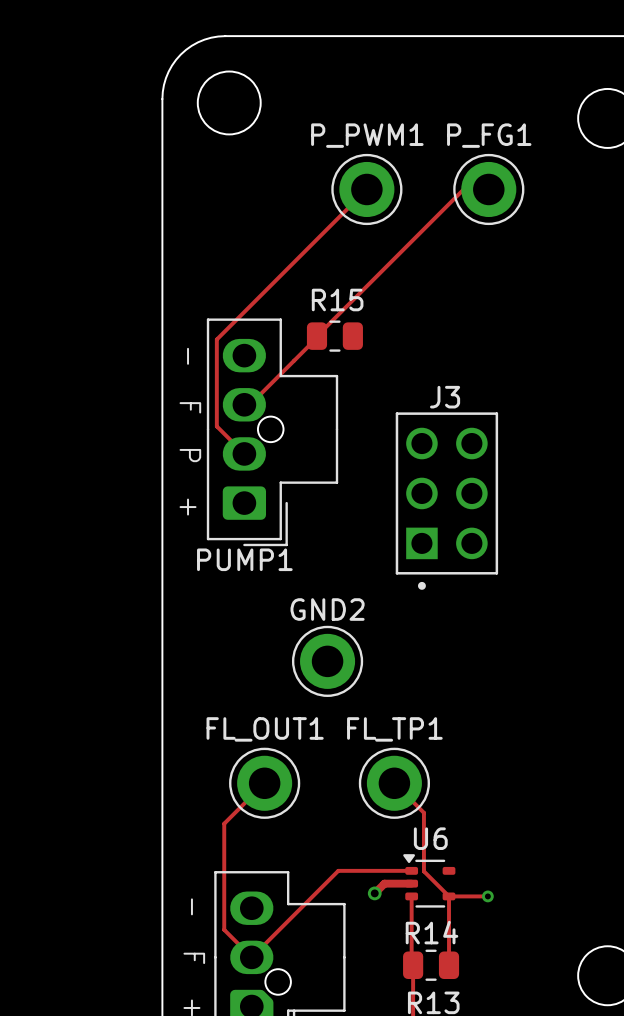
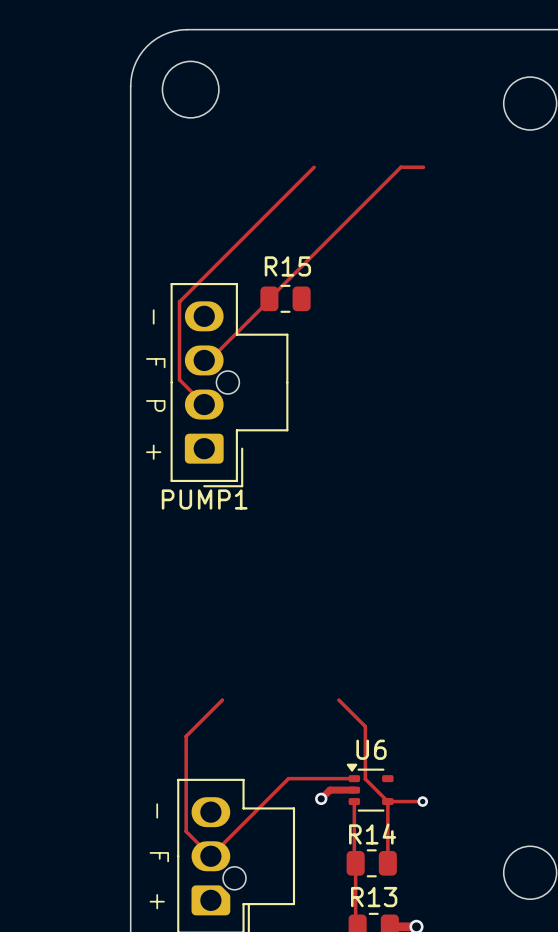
P_PWM1: (366, 189) -> none
P_FG1: (488, 189) -> none
J3: (446, 501) -> none
GND2: (327, 661) -> none
FL_OUT1: (264, 783) -> none
FL_TP1: (394, 783) -> none

